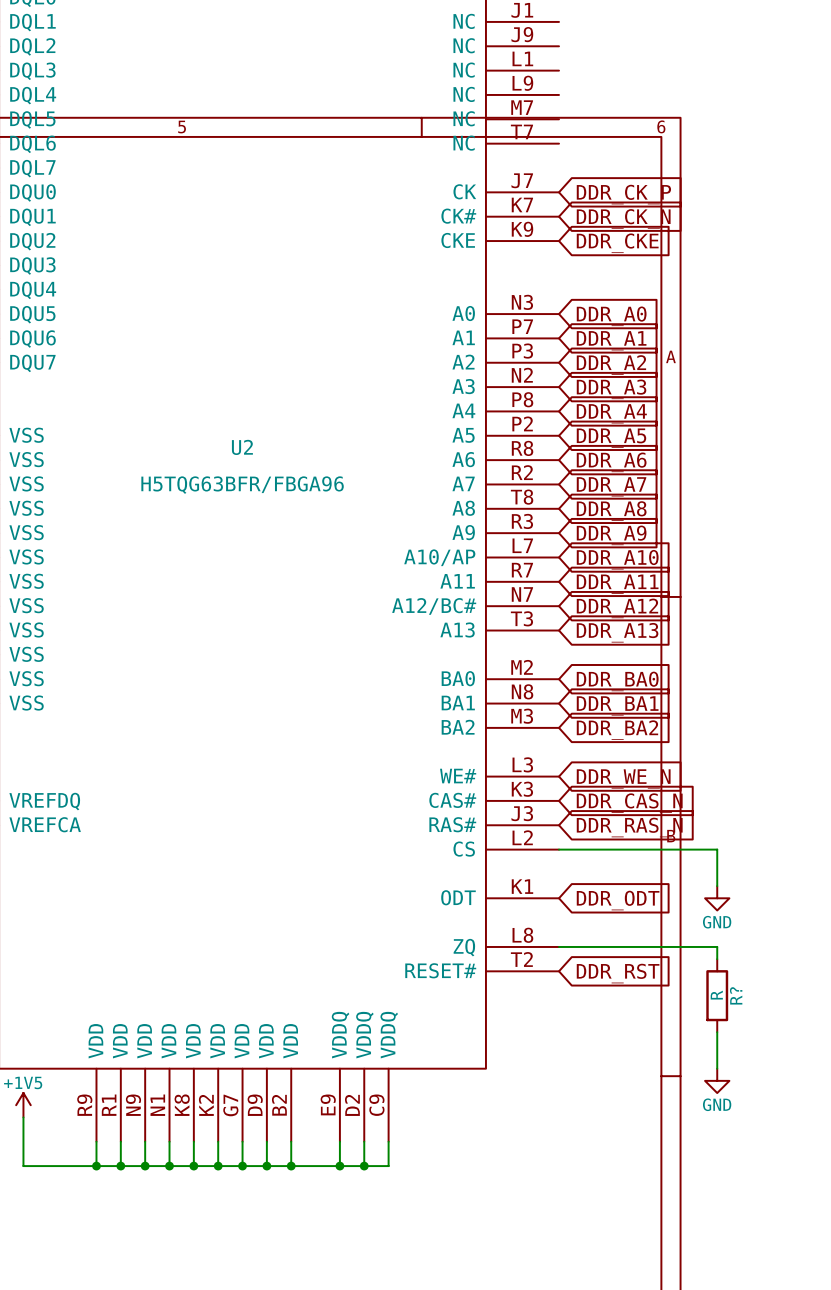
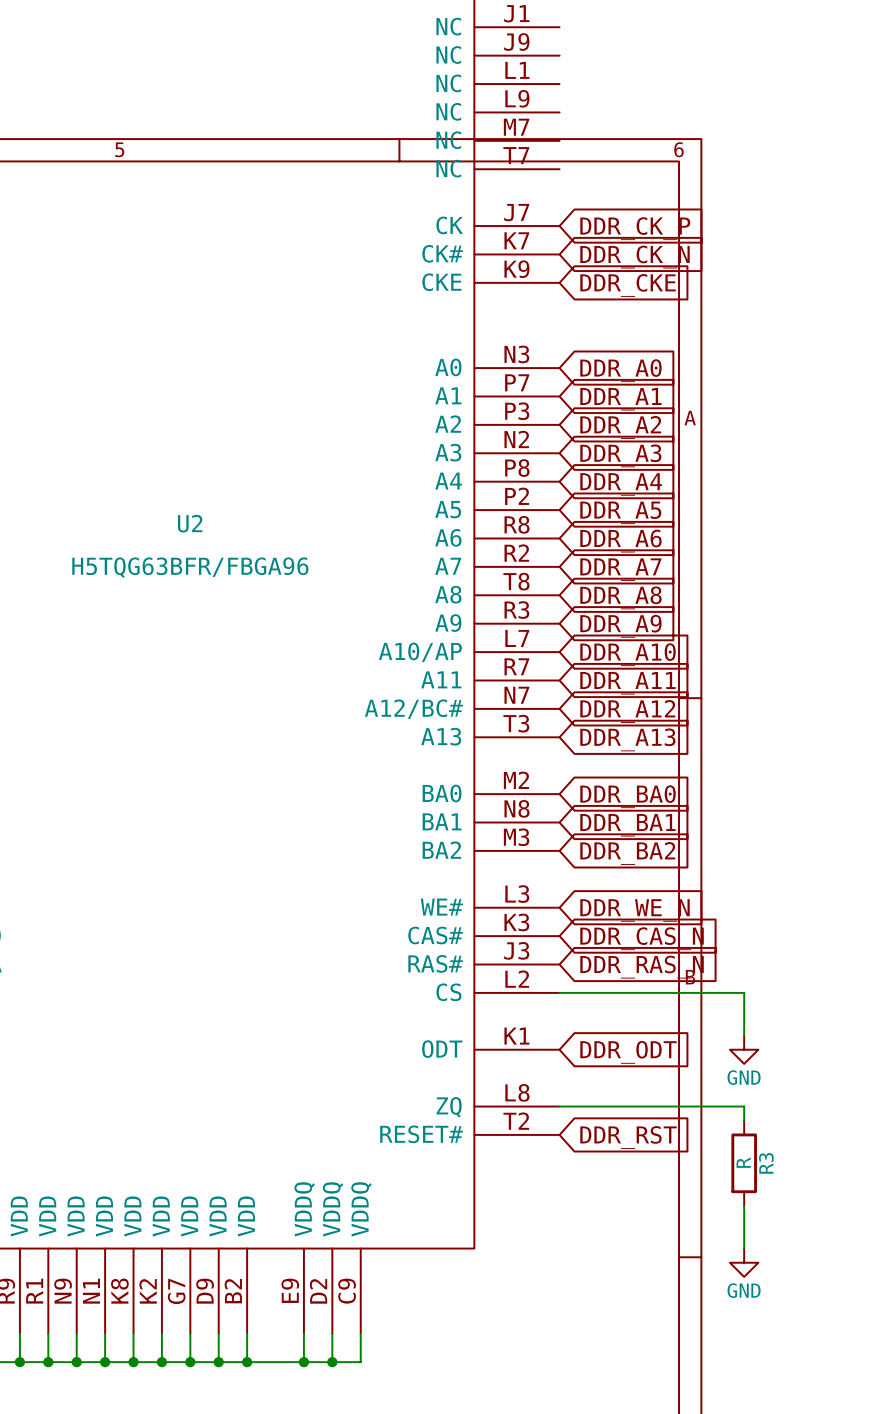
R? name: R? (736, 995) -> R3 (766, 1163)

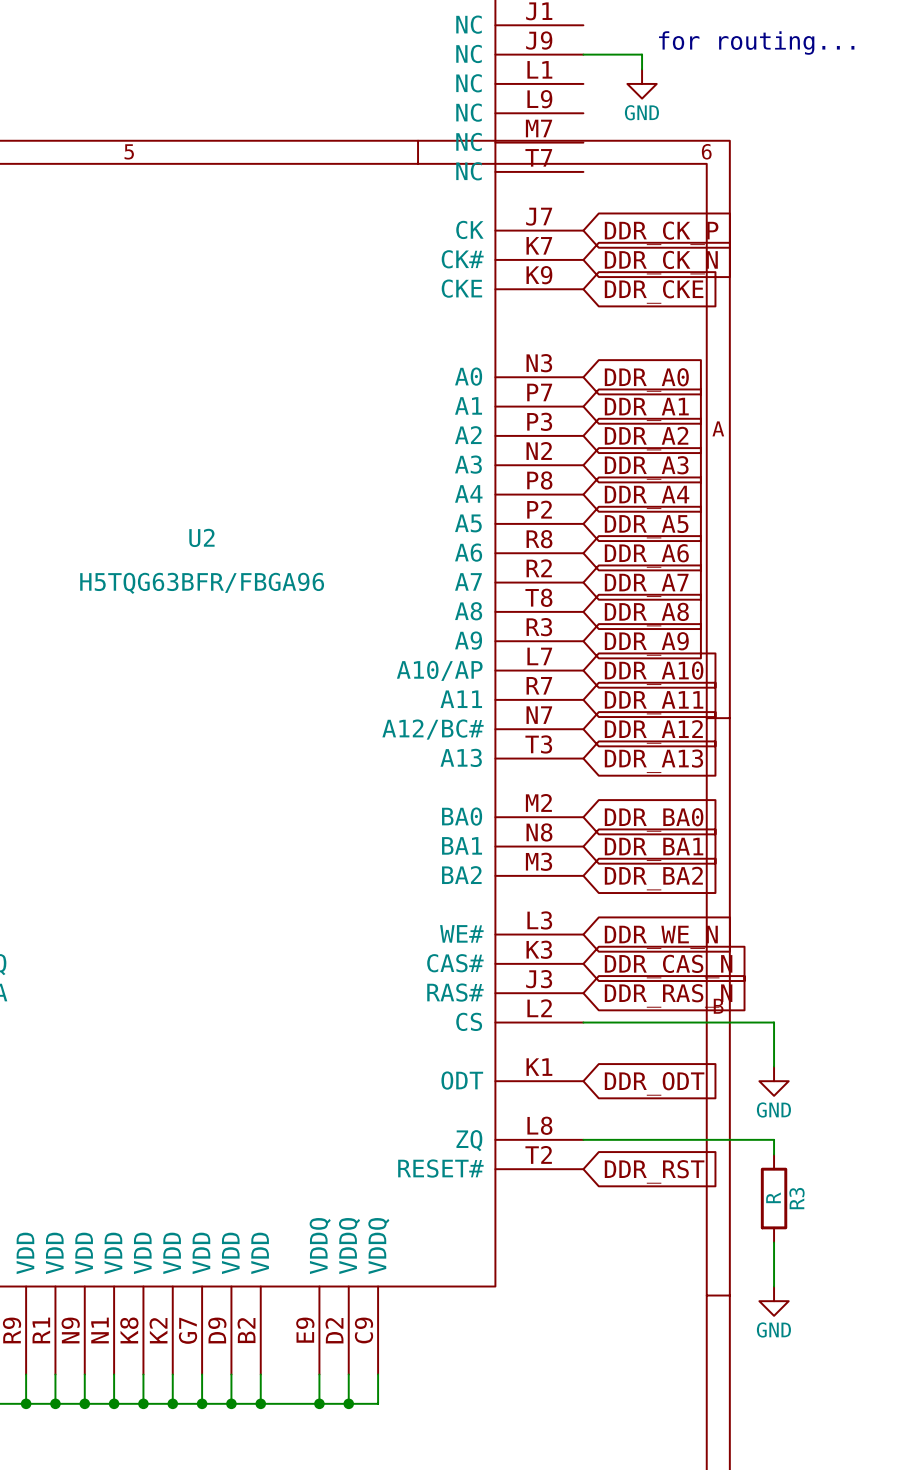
text: none -> for routing... (756, 43)
wire: none -> (583, 54) (642, 54) (642, 69)
power symbol: none -> GND (642, 83)

